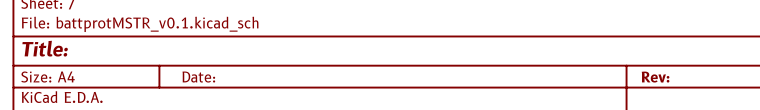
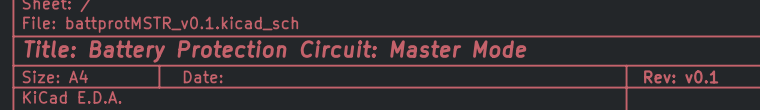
title block: Title: (45, 48) -> Title: Battery Protection Circuit: Master Mode (275, 51)
title block: Rev: (655, 77) -> Rev: v0.1 (681, 76)

